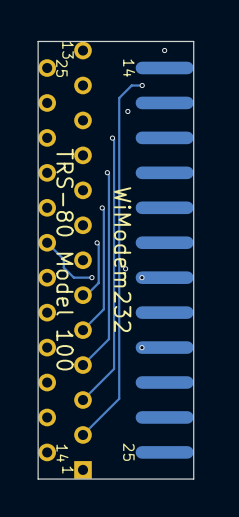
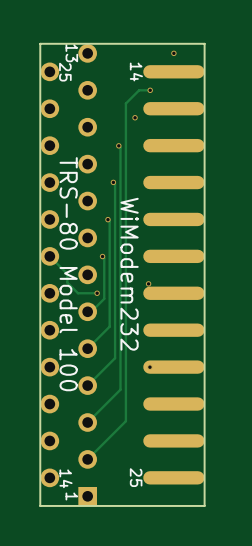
via: (125, 268) -> none
via: none -> (148, 283)
via: (141, 277) -> none

